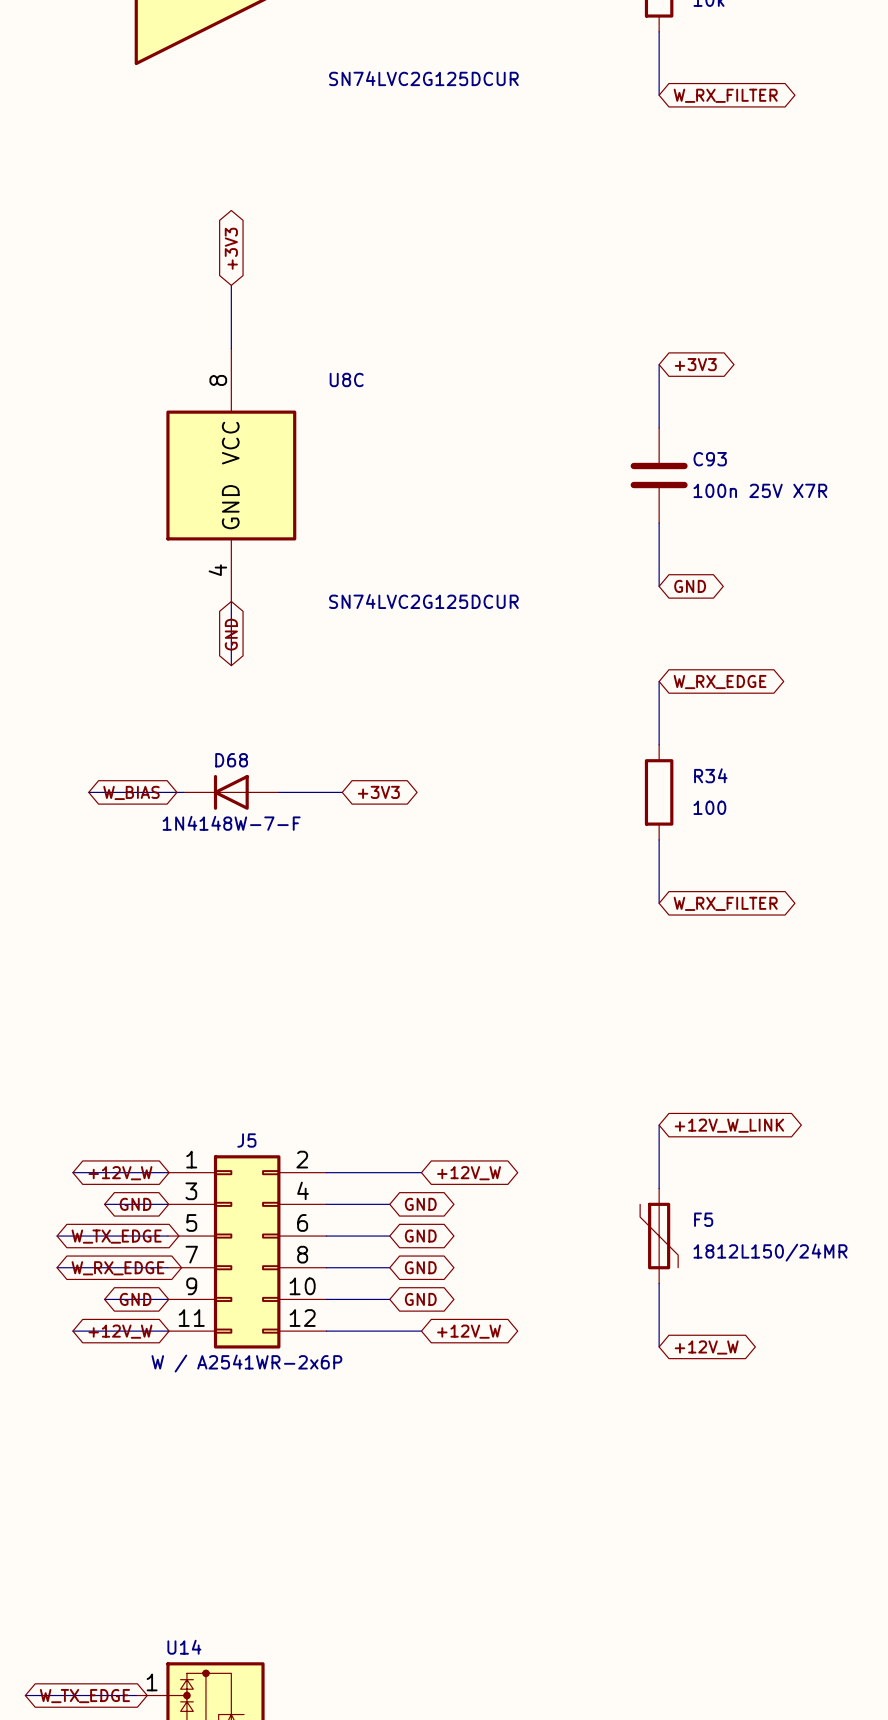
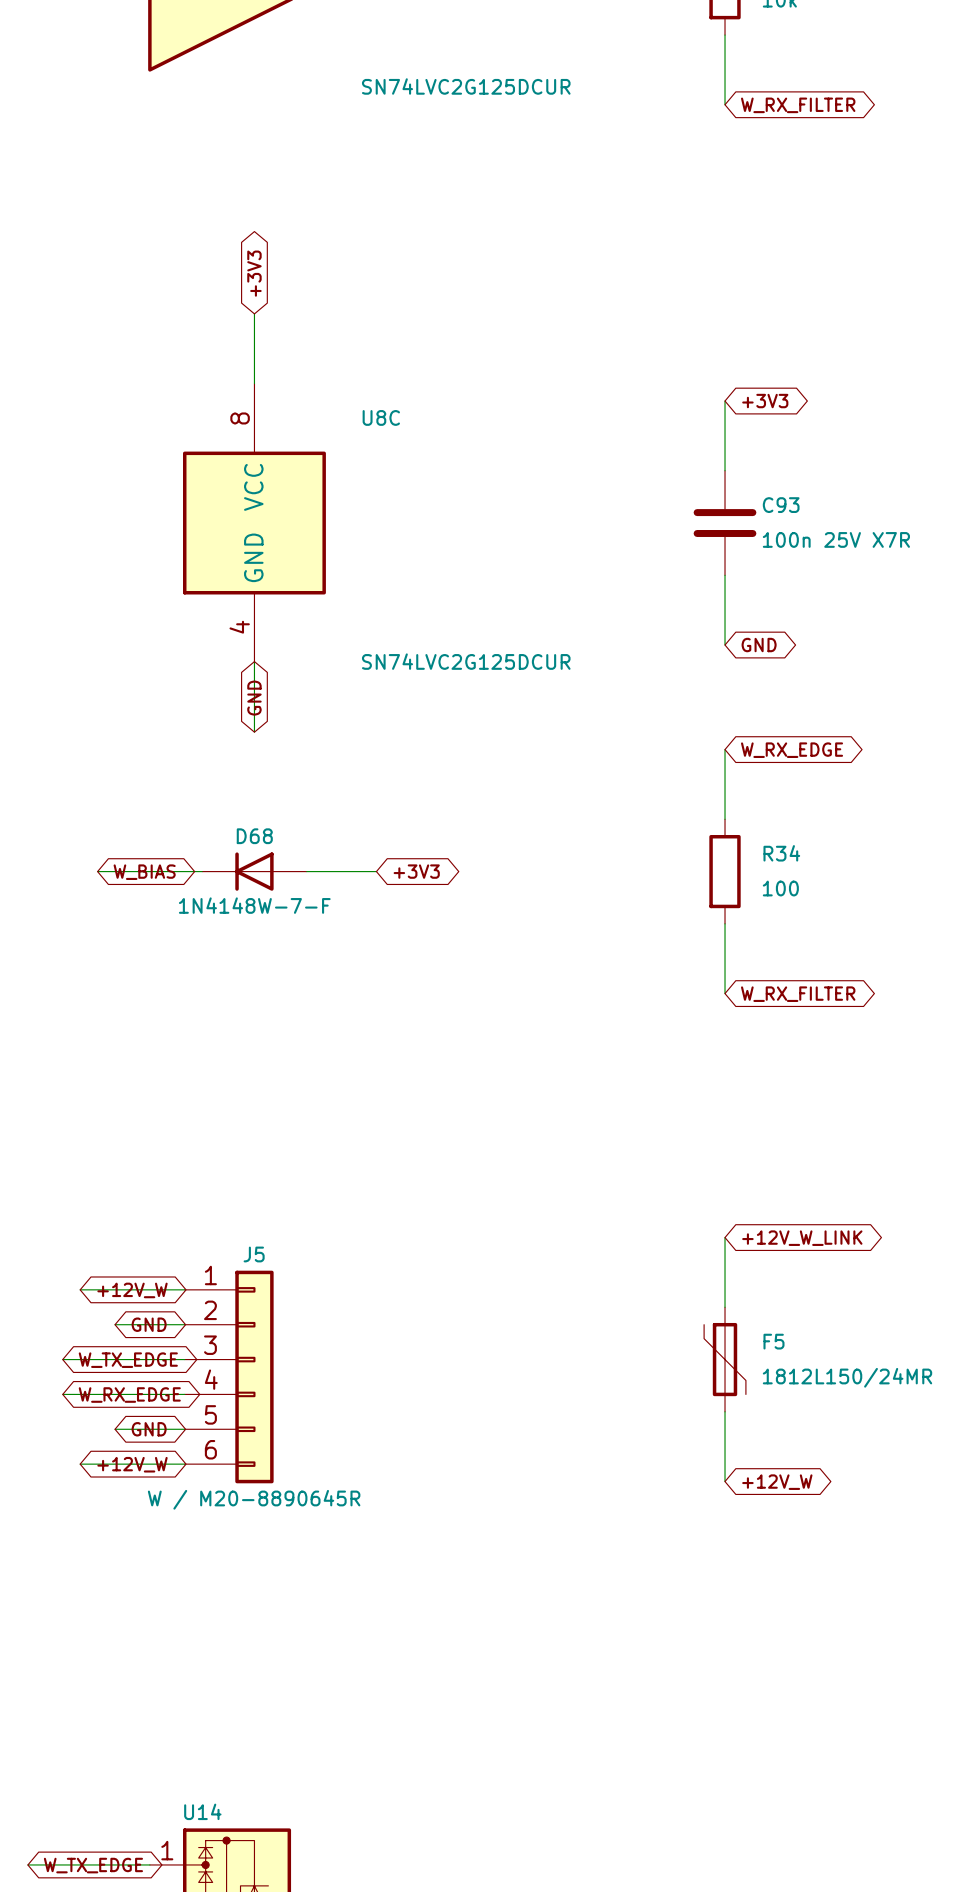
J5 symbol: [167, 1155, 327, 1349] -> [184, 1270, 274, 1484]
wire: (326, 1172) (421, 1172) -> none
global label: +12V_W (469, 1173) -> none
wire: (326, 1204) (389, 1204) -> none
global label: GND (420, 1204) -> none
wire: (326, 1236) (389, 1236) -> none
global label: GND (420, 1236) -> none
wire: (326, 1267) (389, 1267) -> none
global label: GND (420, 1267) -> none
wire: (326, 1299) (389, 1299) -> none
global label: GND (420, 1299) -> none
wire: (326, 1331) (421, 1331) -> none
global label: +12V_W (469, 1331) -> none
J5 value: W / A2541WR-2x6P (246, 1363) -> W / M20-8890645R (254, 1499)

